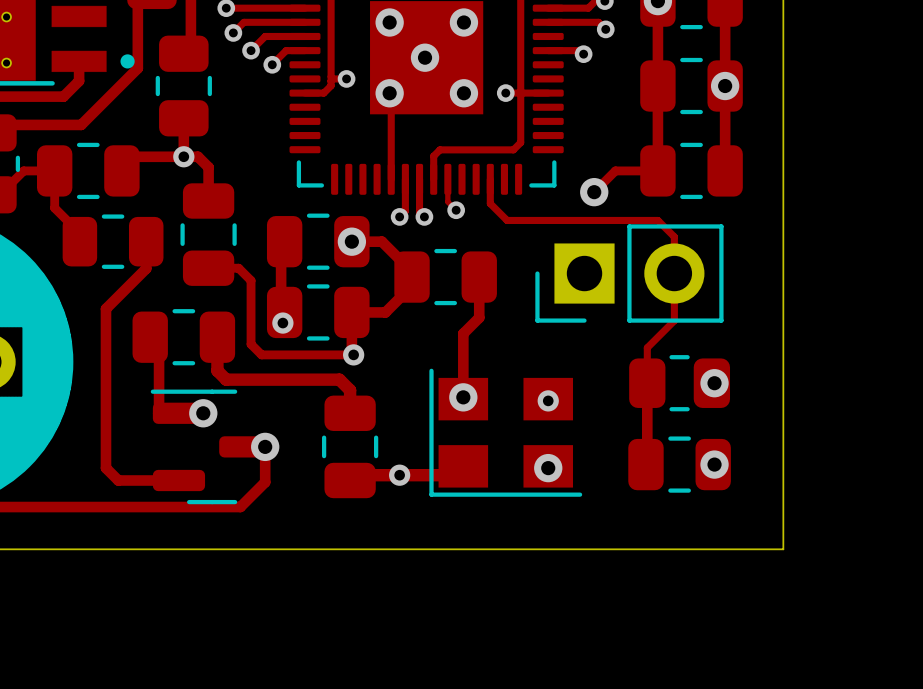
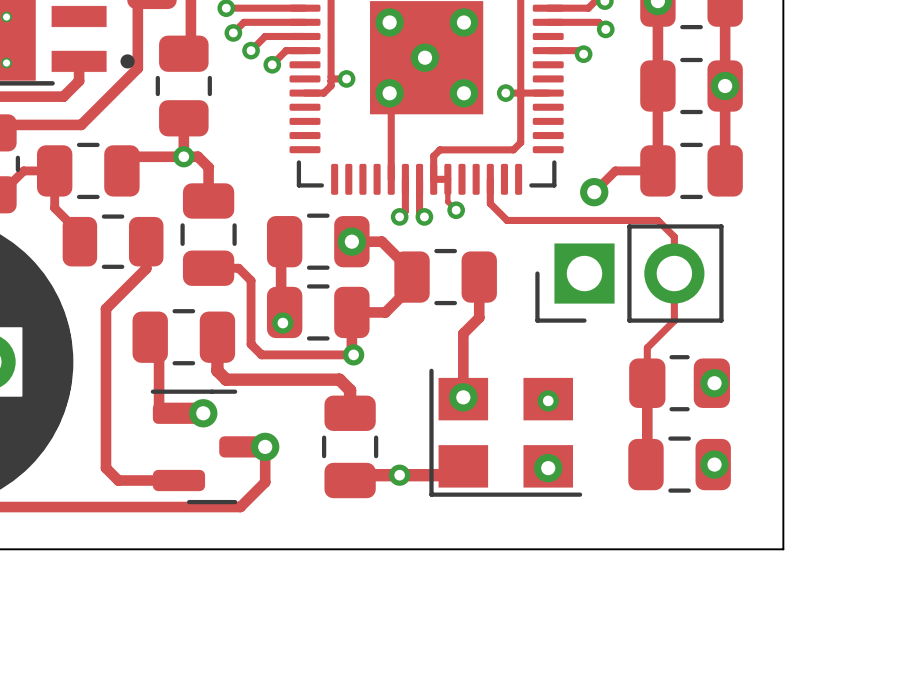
track: none -> (433, 179) (447, 179)

